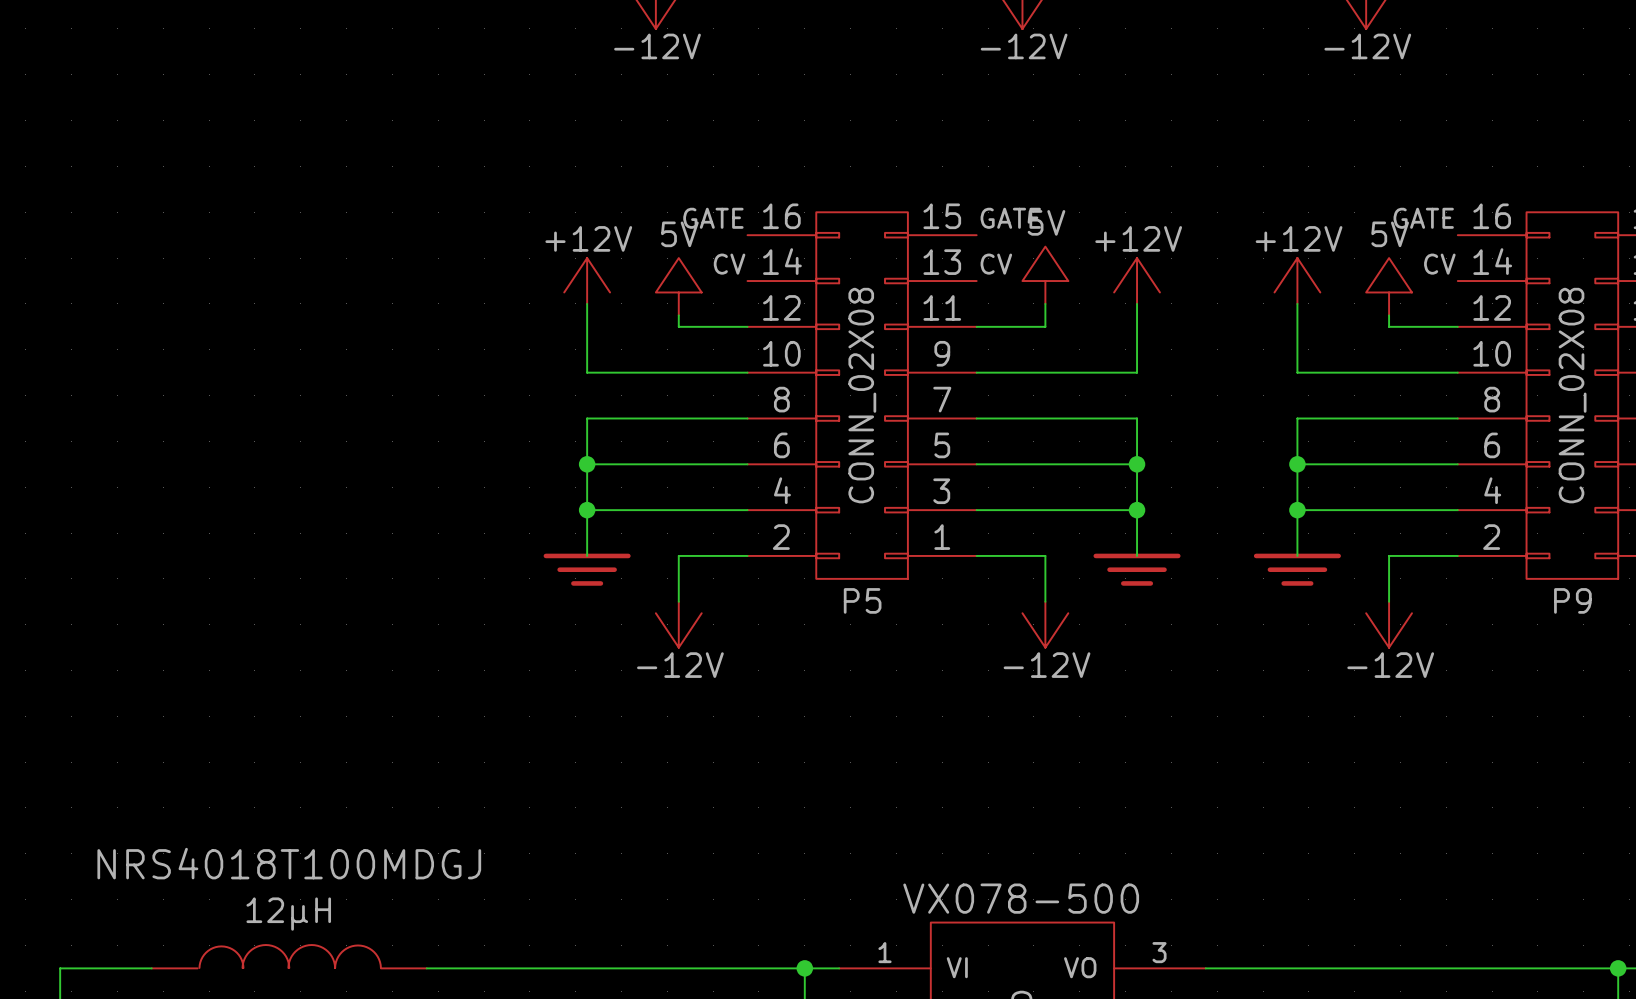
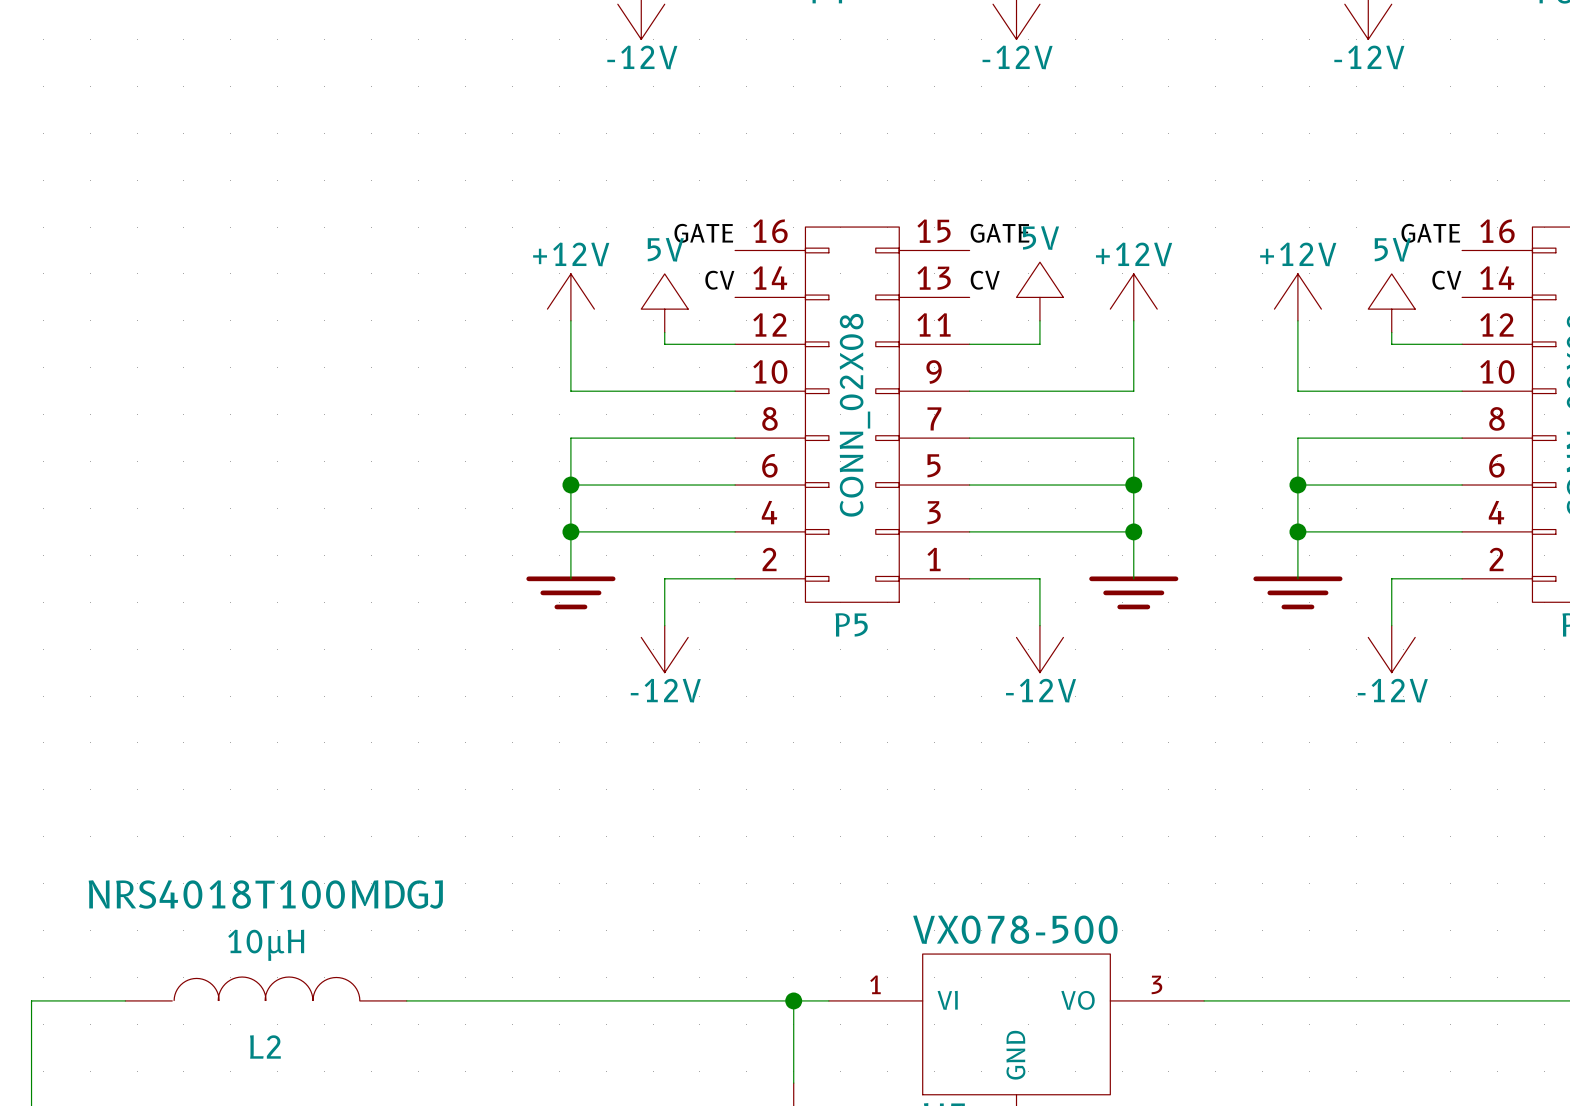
L2 value: 12µH (288, 914) -> 10µH (266, 945)

